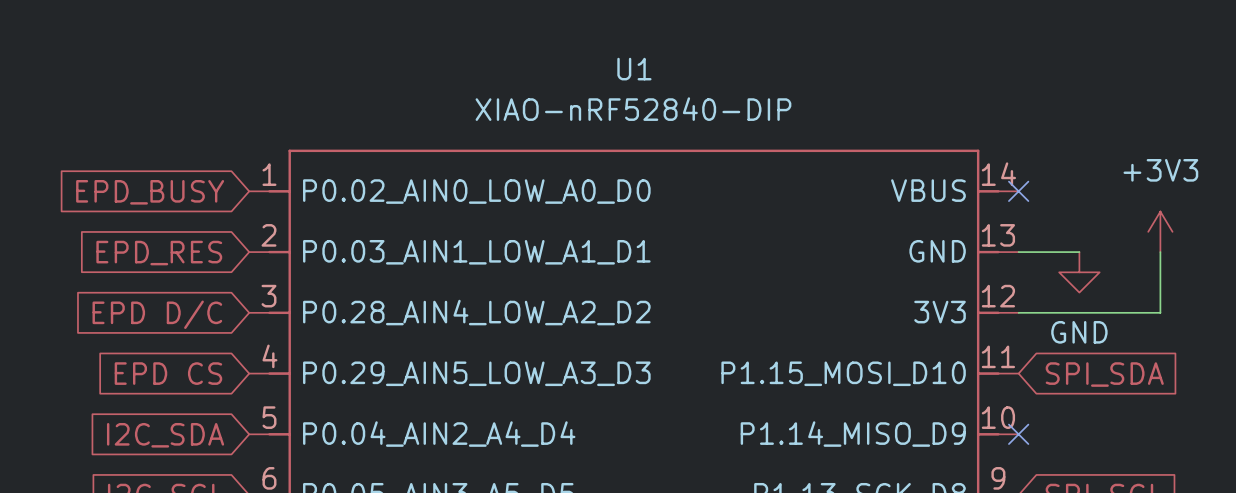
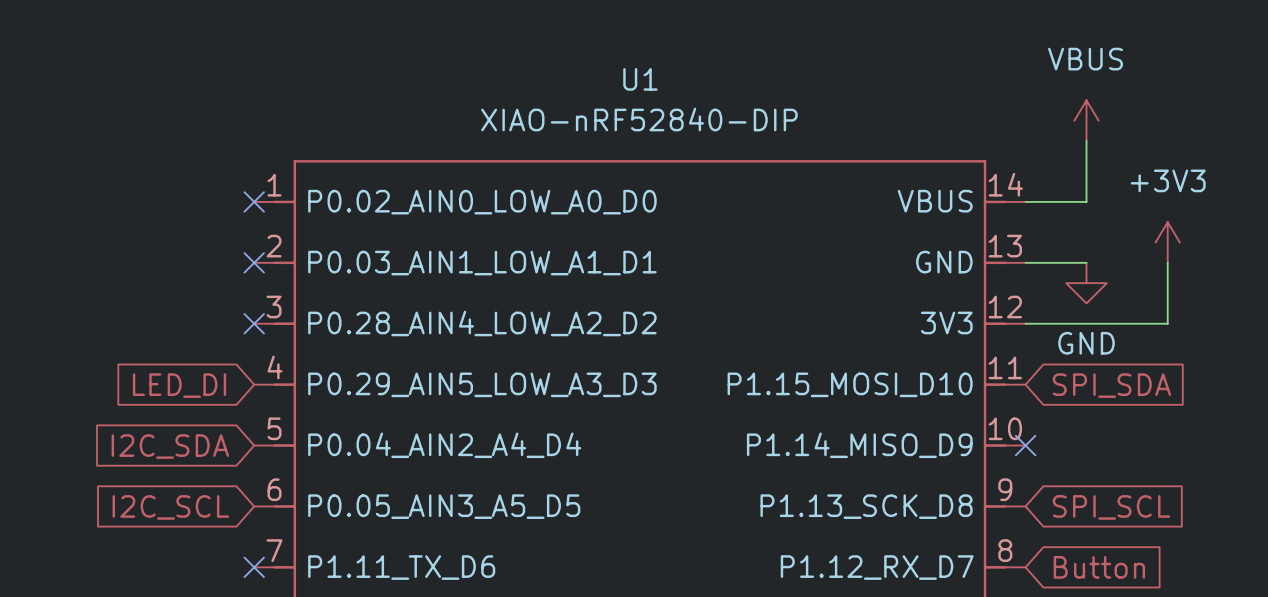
power symbol: none -> VBUS (1086, 120)
wire: none -> (1086, 141) (1086, 201) (1025, 201)
no-connect mark: none -> (254, 201)
no-connect mark: (1018, 191) -> none
global label: EPD_BUSY (150, 192) -> none
no-connect mark: none -> (254, 262)
global label: EPD_RES (159, 253) -> none
no-connect mark: none -> (254, 323)
global label: EPD D/C (157, 314) -> none
global label: EPD CS (168, 373) -> LED_DI (179, 385)

